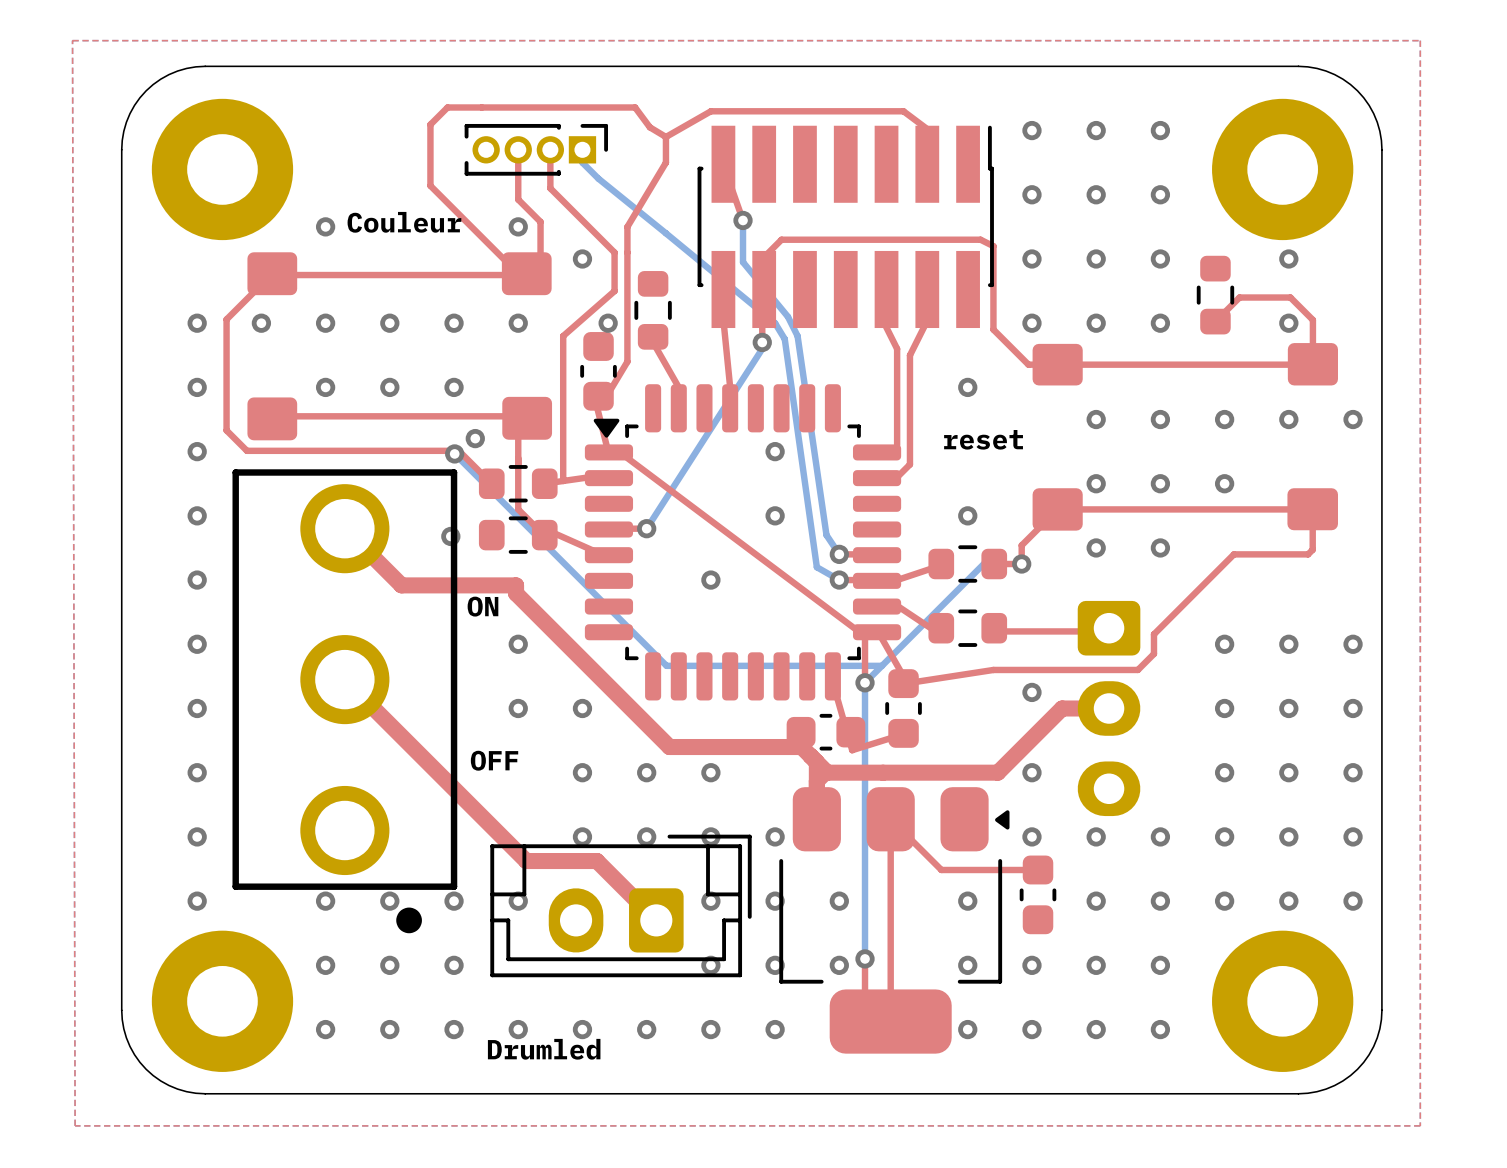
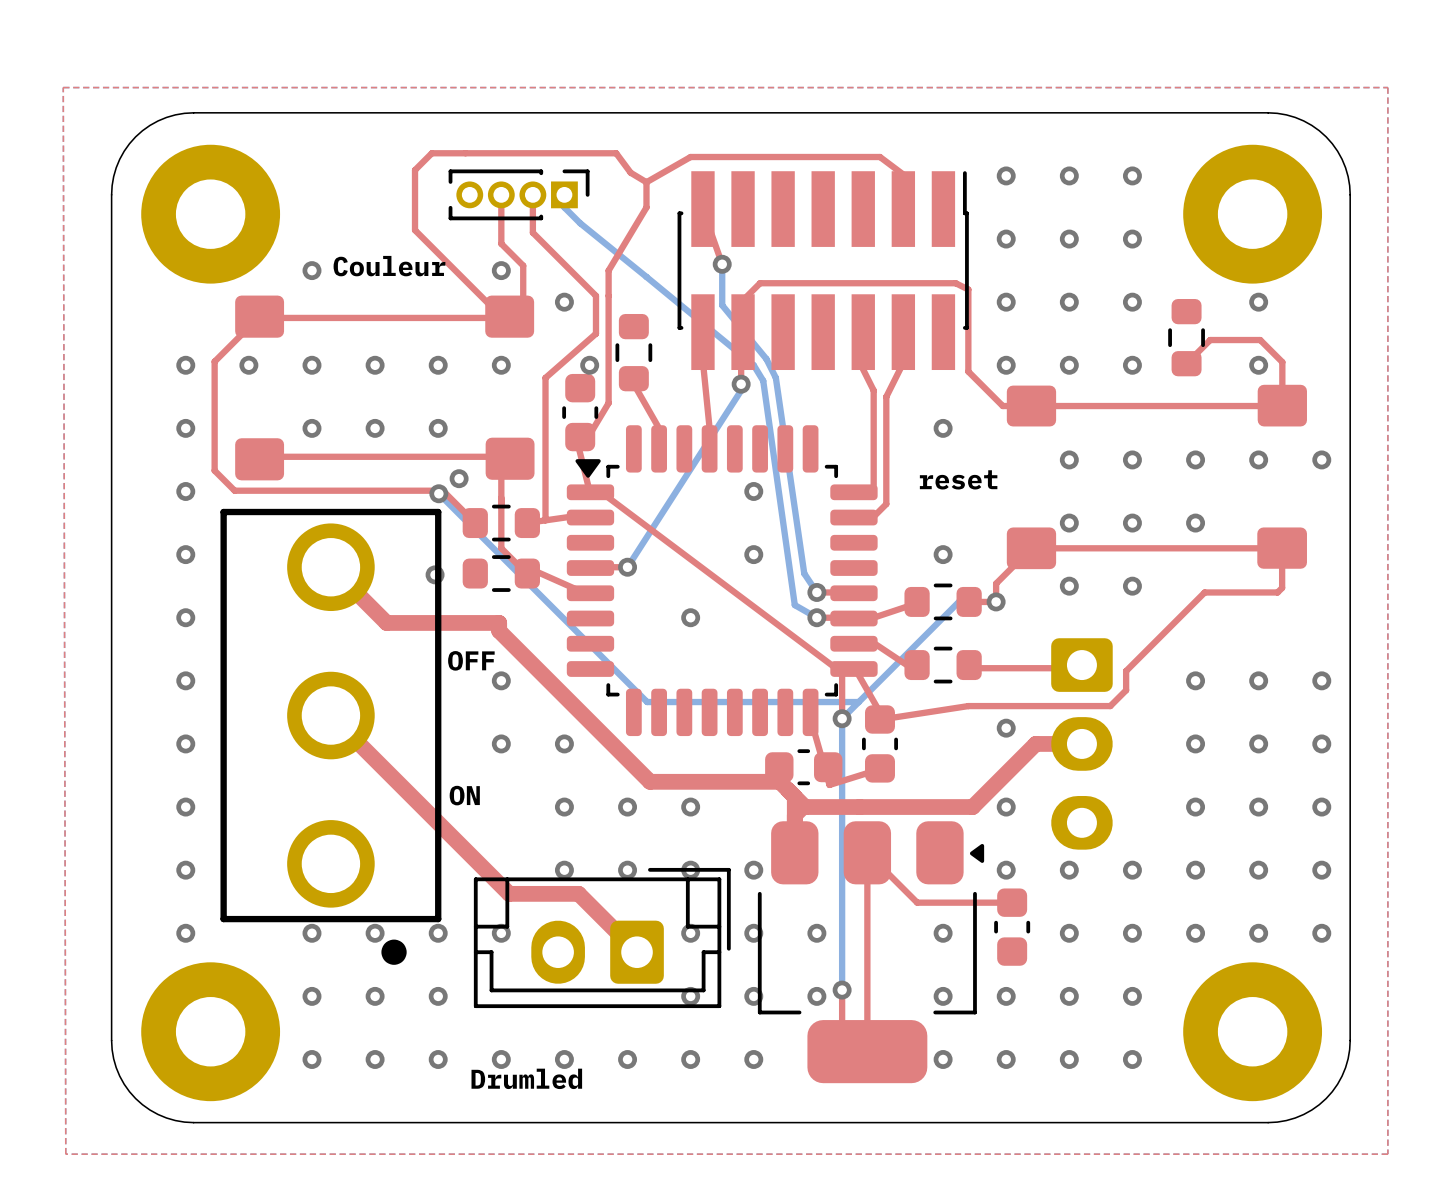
text position: ON (482, 606) -> ON (464, 795)
text position: OFF (494, 760) -> OFF (471, 660)

